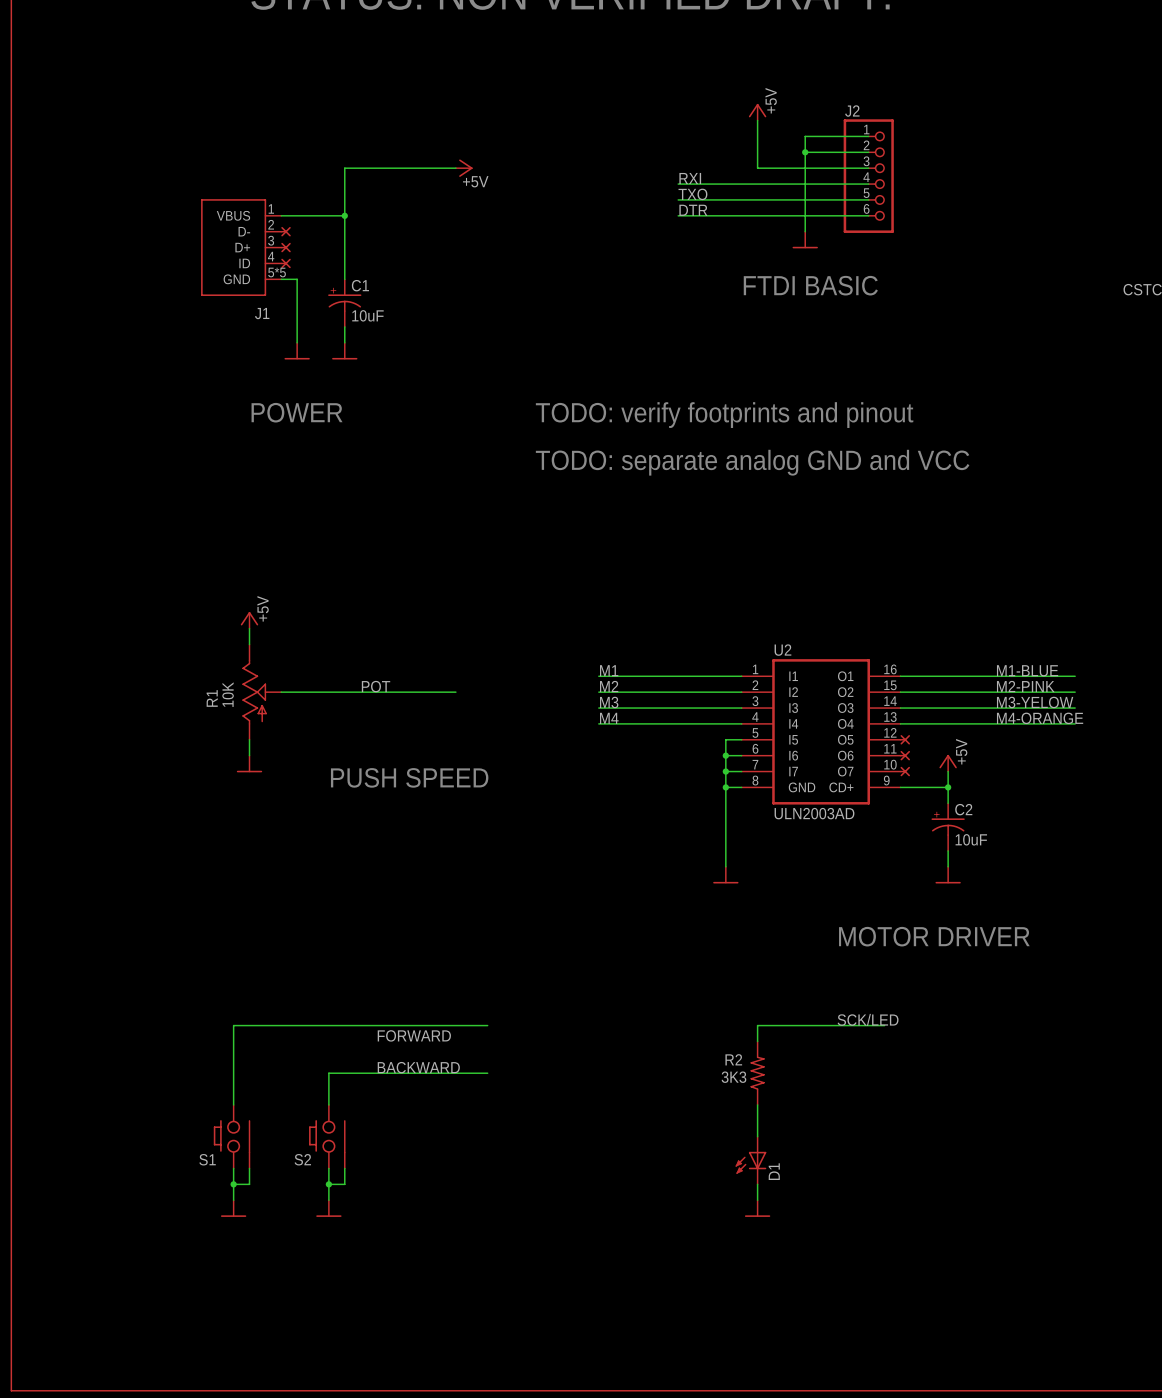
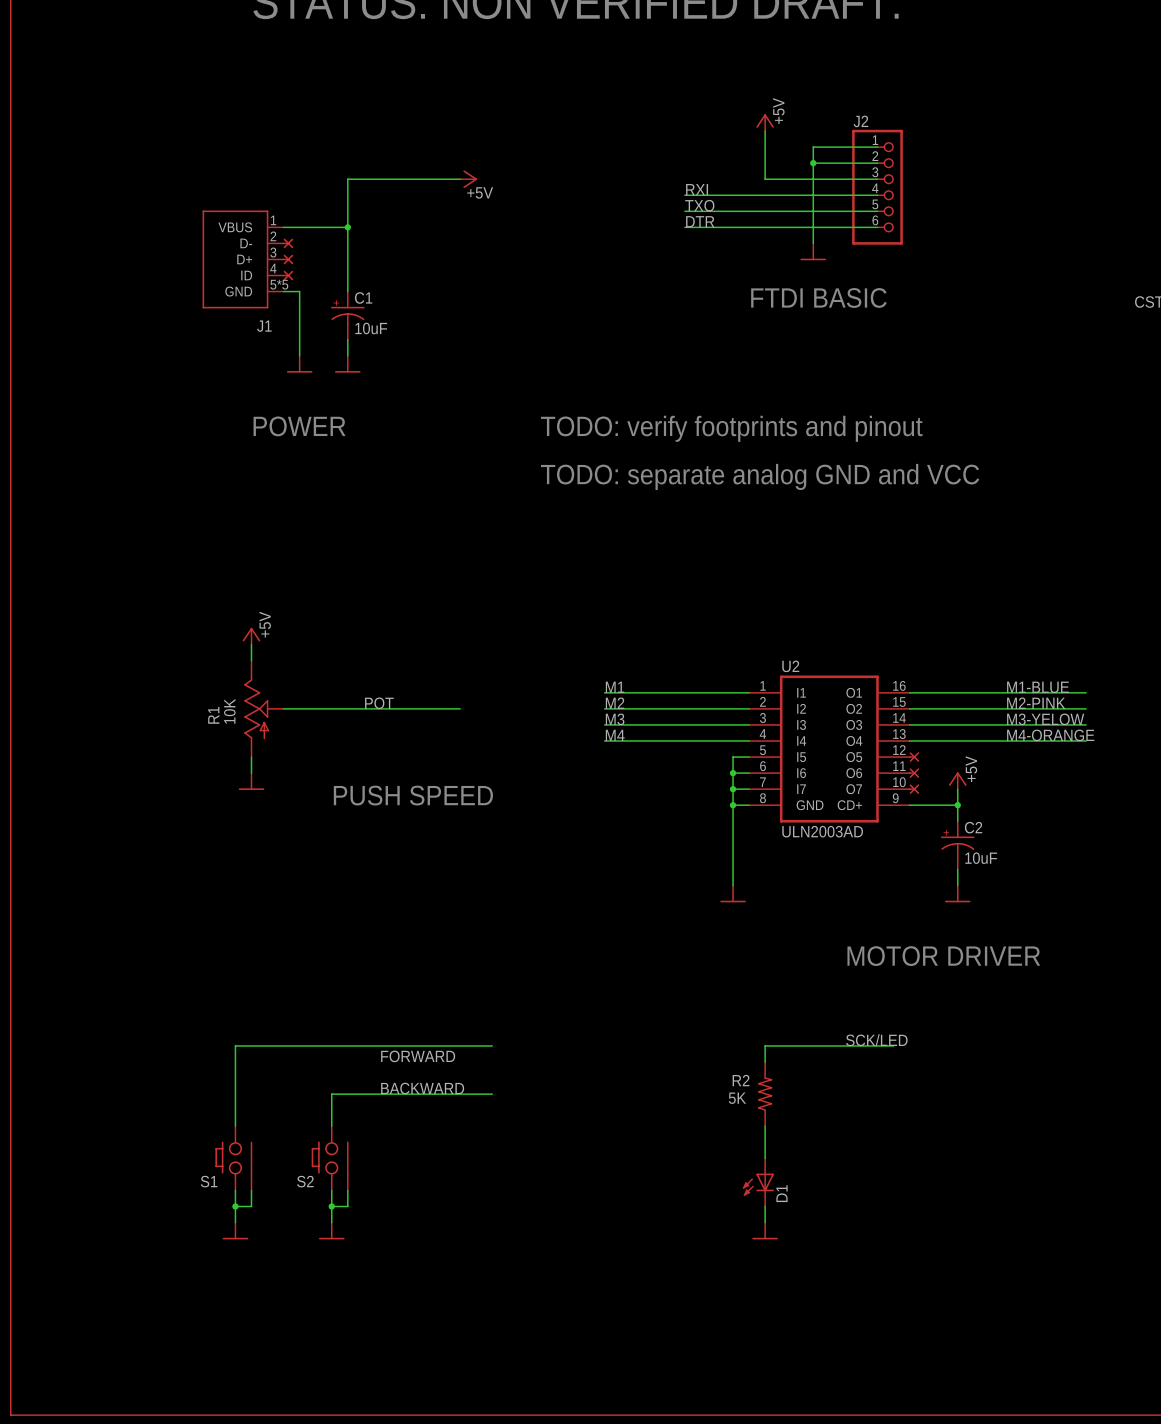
R2 value: 3K3 (733, 1077) -> 5K (737, 1098)

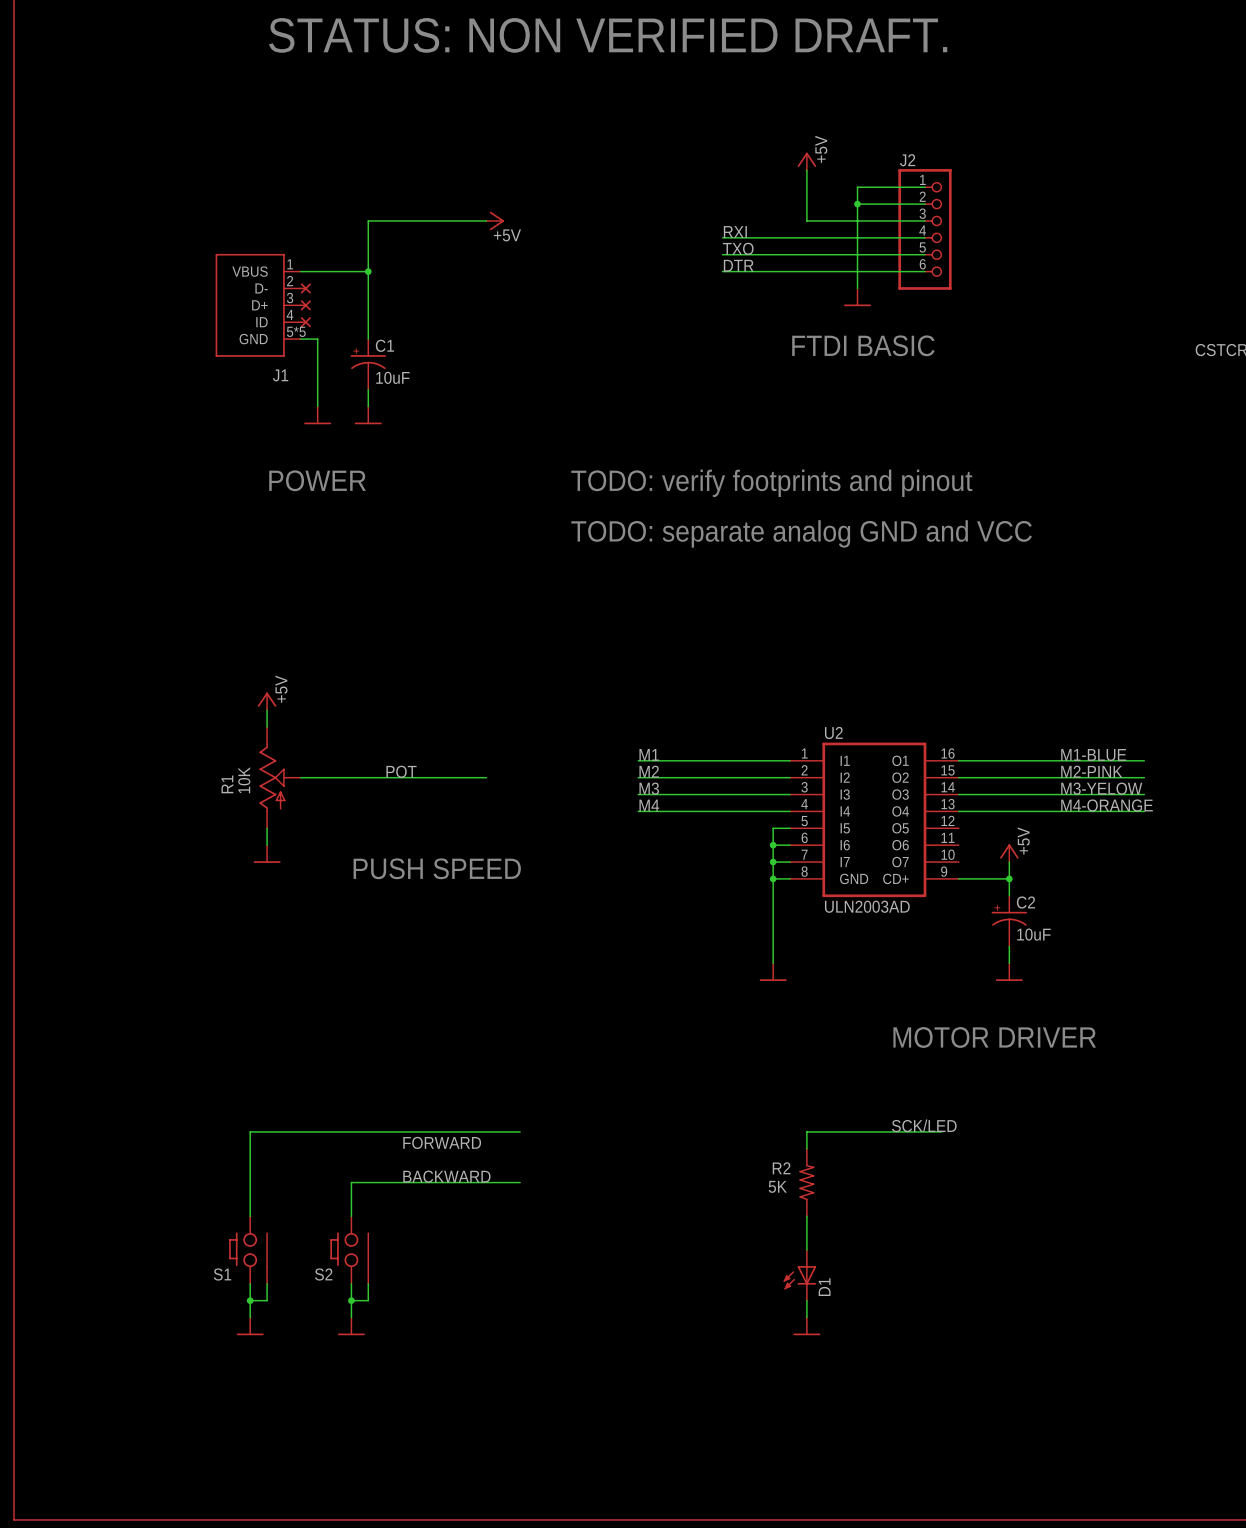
part: (914, 757) -> none
part: (914, 773) -> none
part: (914, 789) -> none

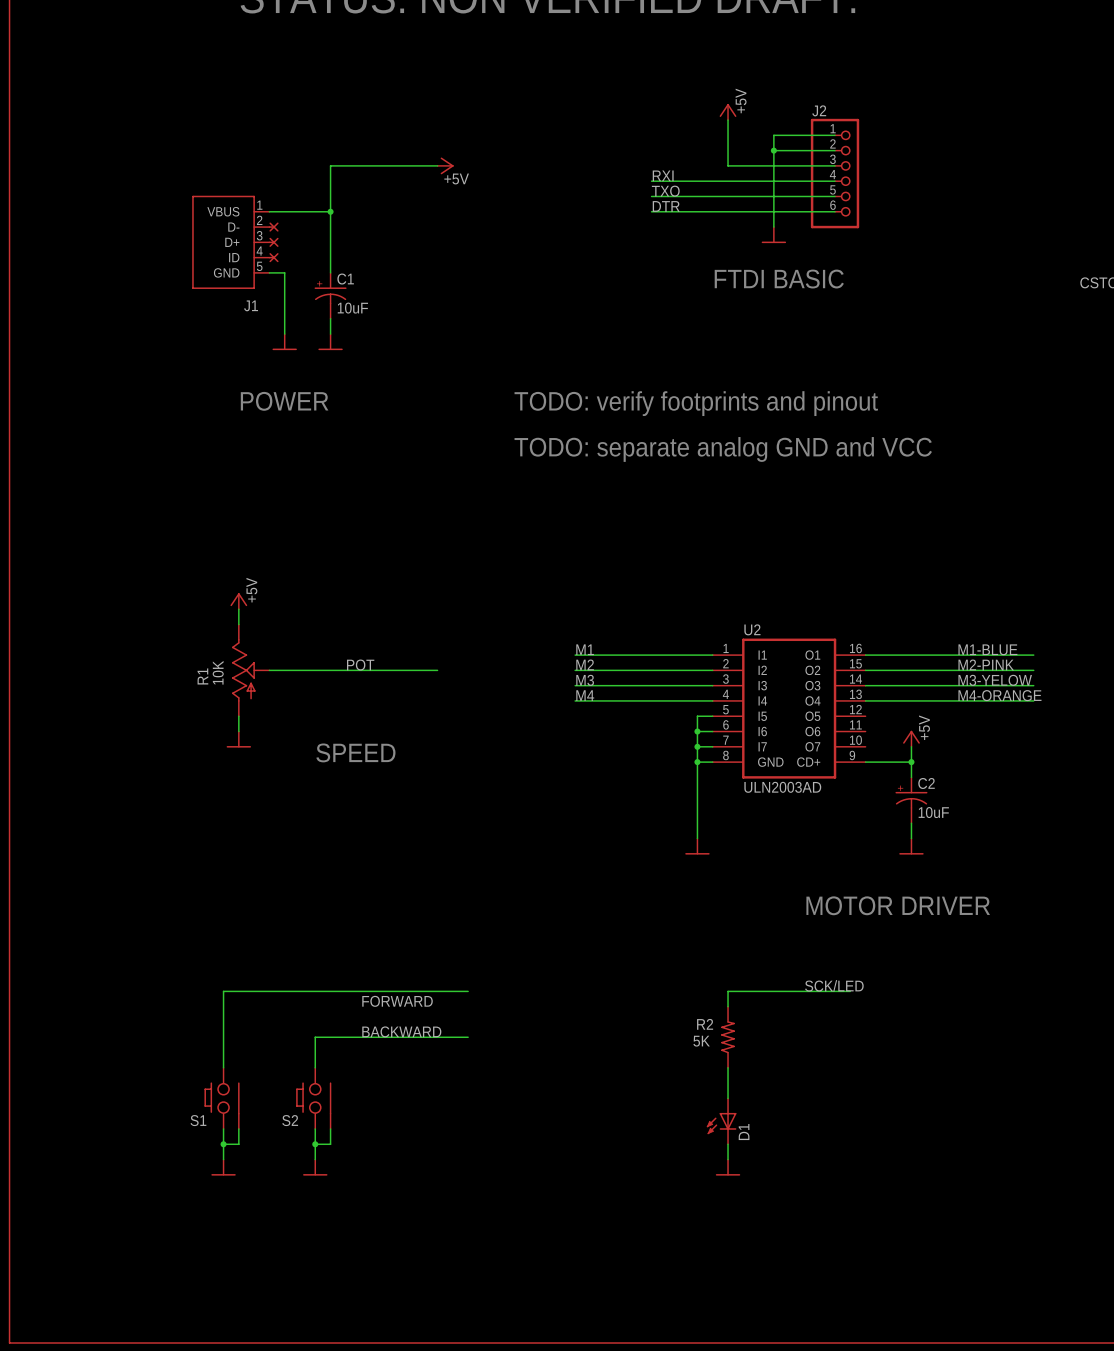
J1 pin number: 5*5 (296, 331) -> 5 (259, 266)
text: PUSH SPEED (437, 868) -> SPEED (355, 752)

